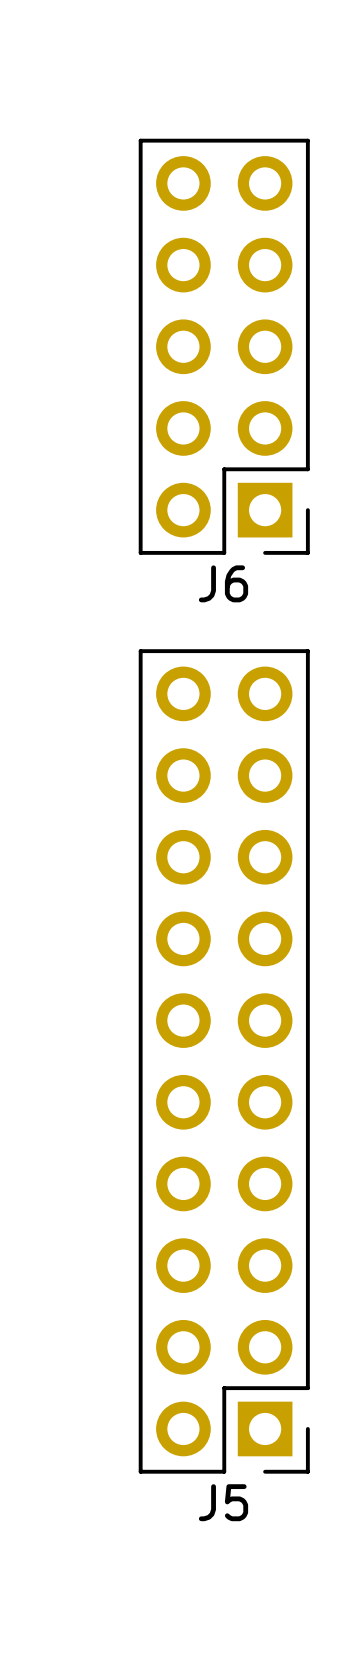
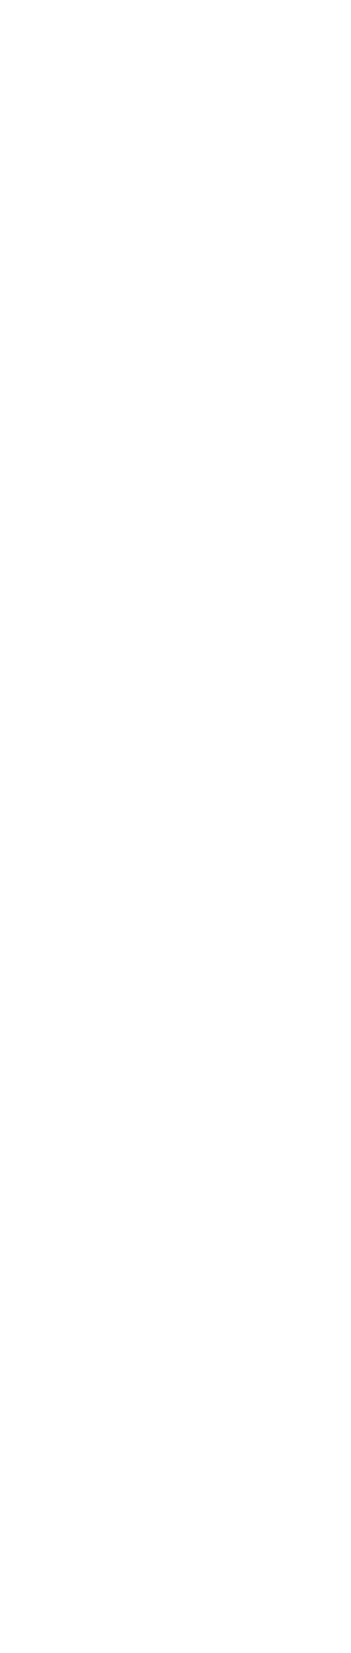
J6: (224, 346) -> none
J5: (224, 1061) -> none

